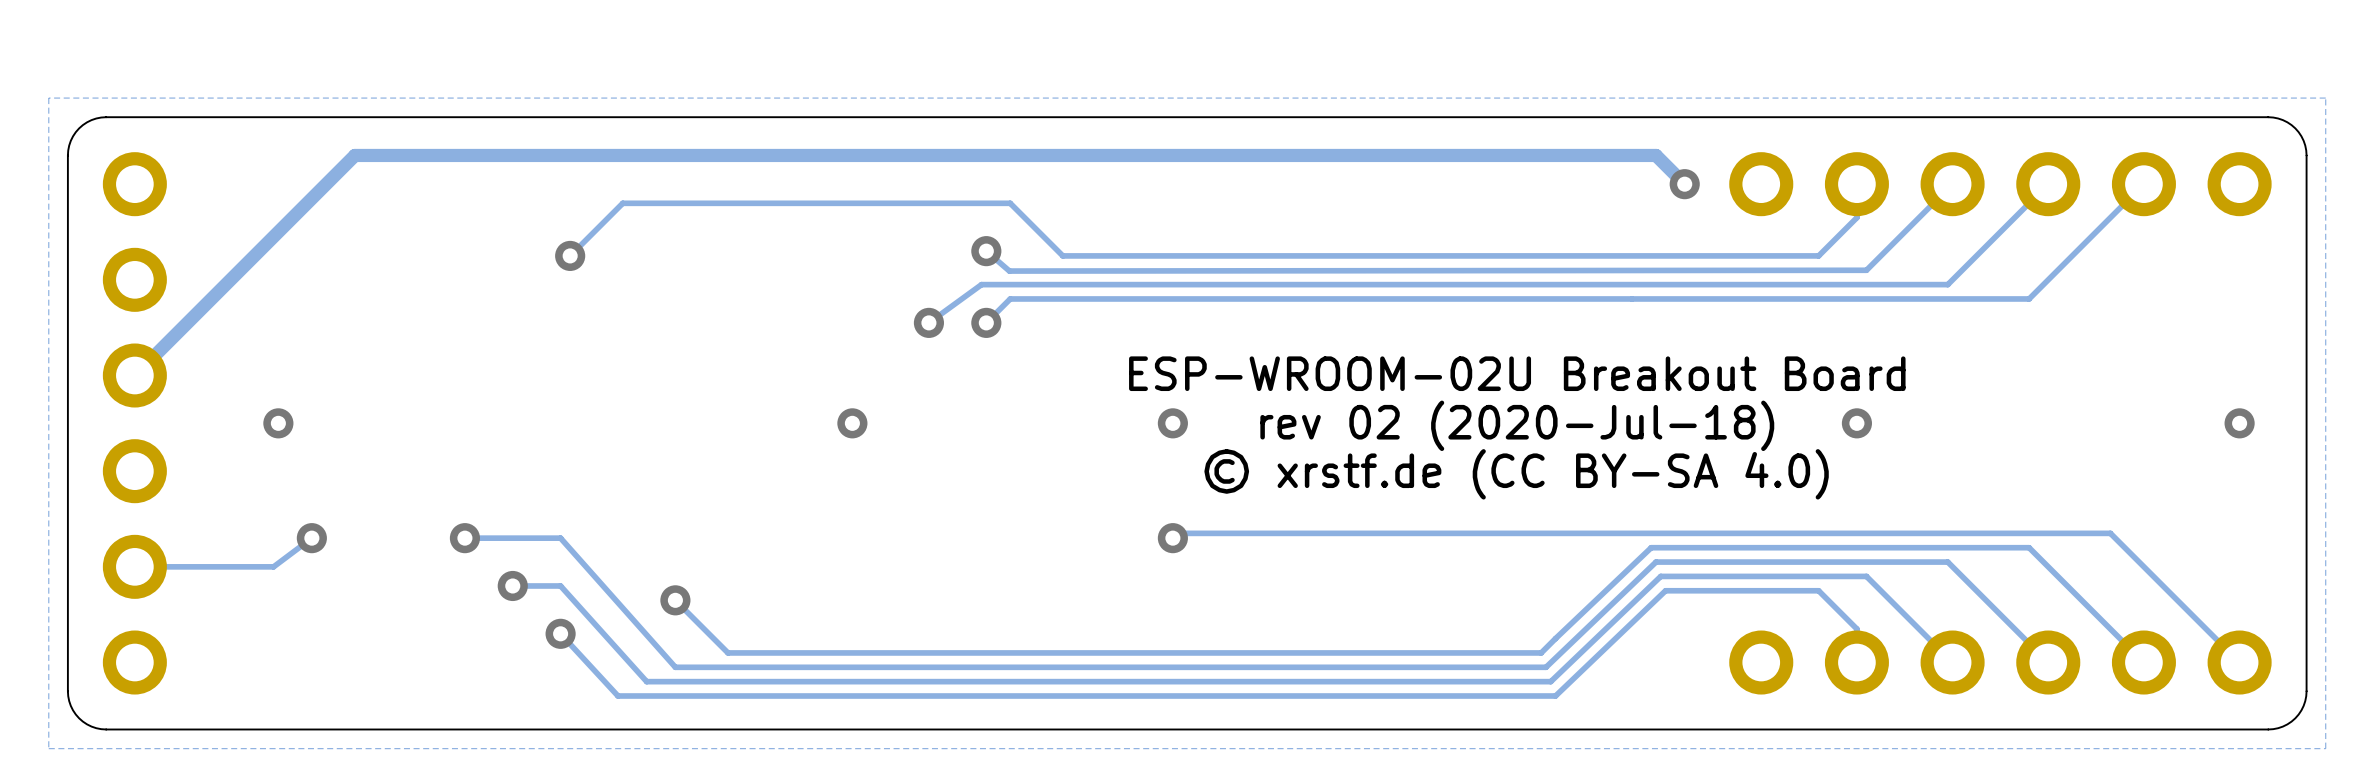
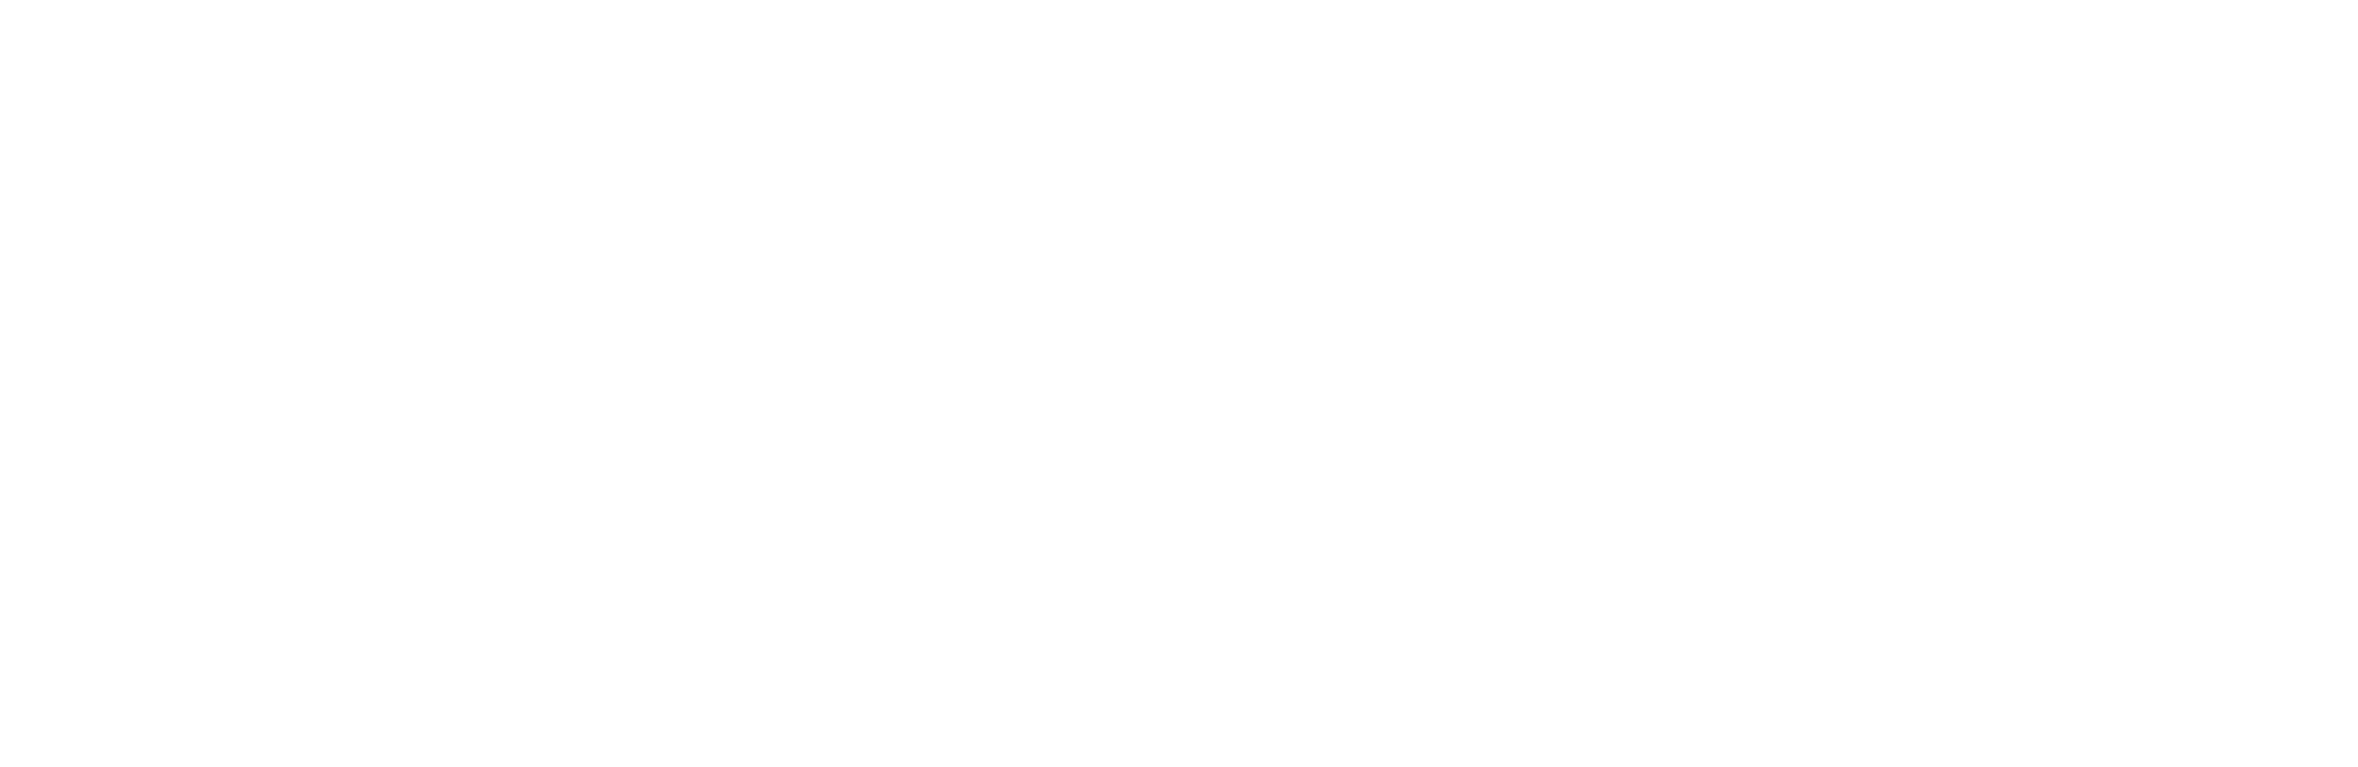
zone outline: (2325, 98) (2325, 748) (48, 748) (48, 98) (2325, 98) -> none
board edge: (2268, 117) (96, 118) (87, 122) (75, 132) (69, 145) (67, 155) (69, 701) (73, 710) (82, 721) (91, 726) (106, 729) (2278, 728) (2291, 721) (2298, 714) (2303, 705) (2306, 691) (2306, 155) (2303, 140) (2295, 128) (2282, 120) (2268, 117) -> none
track: (1684, 184) (1656, 155) (354, 155) (134, 375) -> none
via: (1684, 184) -> none
track: (1856, 184) (1856, 217) (1818, 255) (1062, 255) (1010, 203) (622, 203) (570, 255) -> none
track: (1952, 184) (1866, 270) (1009, 271) (986, 251) -> none
part: (2000, 184) -> none
track: (2048, 184) (1947, 284) (981, 284) (928, 322) -> none
track: (2143, 184) (2029, 298) (1010, 298) (986, 322) -> none
via: (986, 251) -> none
via: (570, 255) -> none
via: (928, 322) -> none
via: (986, 322) -> none
text: ESP-WROOM-02U Breakout Board (1517, 373) -> none
part: (134, 423) -> none
via: (278, 423) -> none
via: (852, 423) -> none
via: (1172, 423) -> none
via: (1856, 423) -> none
via: (2239, 423) -> none
text: rev 02 (2020-Jul-18) (1517, 425) -> none
text: © xrstf.de (CC BY-SA 4.0) (1516, 474) -> none
track: (311, 538) (273, 566) (134, 566) -> none
via: (311, 538) -> none
track: (464, 538) (560, 538) (675, 667) (1546, 667) (1656, 562) (1947, 562) (2048, 662) -> none
via: (464, 538) -> none
track: (1172, 538) (1177, 533) (2110, 533) (2239, 662) -> none
via: (1172, 538) -> none
track: (512, 585) (560, 585) (646, 681) (1550, 681) (1660, 576) (1866, 576) (1952, 662) -> none
via: (512, 585) -> none
track: (675, 600) (728, 652) (1541, 652) (1651, 547) (2029, 547) (2143, 662) -> none
via: (675, 600) -> none
track: (560, 633) (618, 696) (1555, 696) (1665, 590) (1818, 590) (1856, 629) (1856, 662) -> none
via: (560, 633) -> none
part: (2000, 662) -> none

